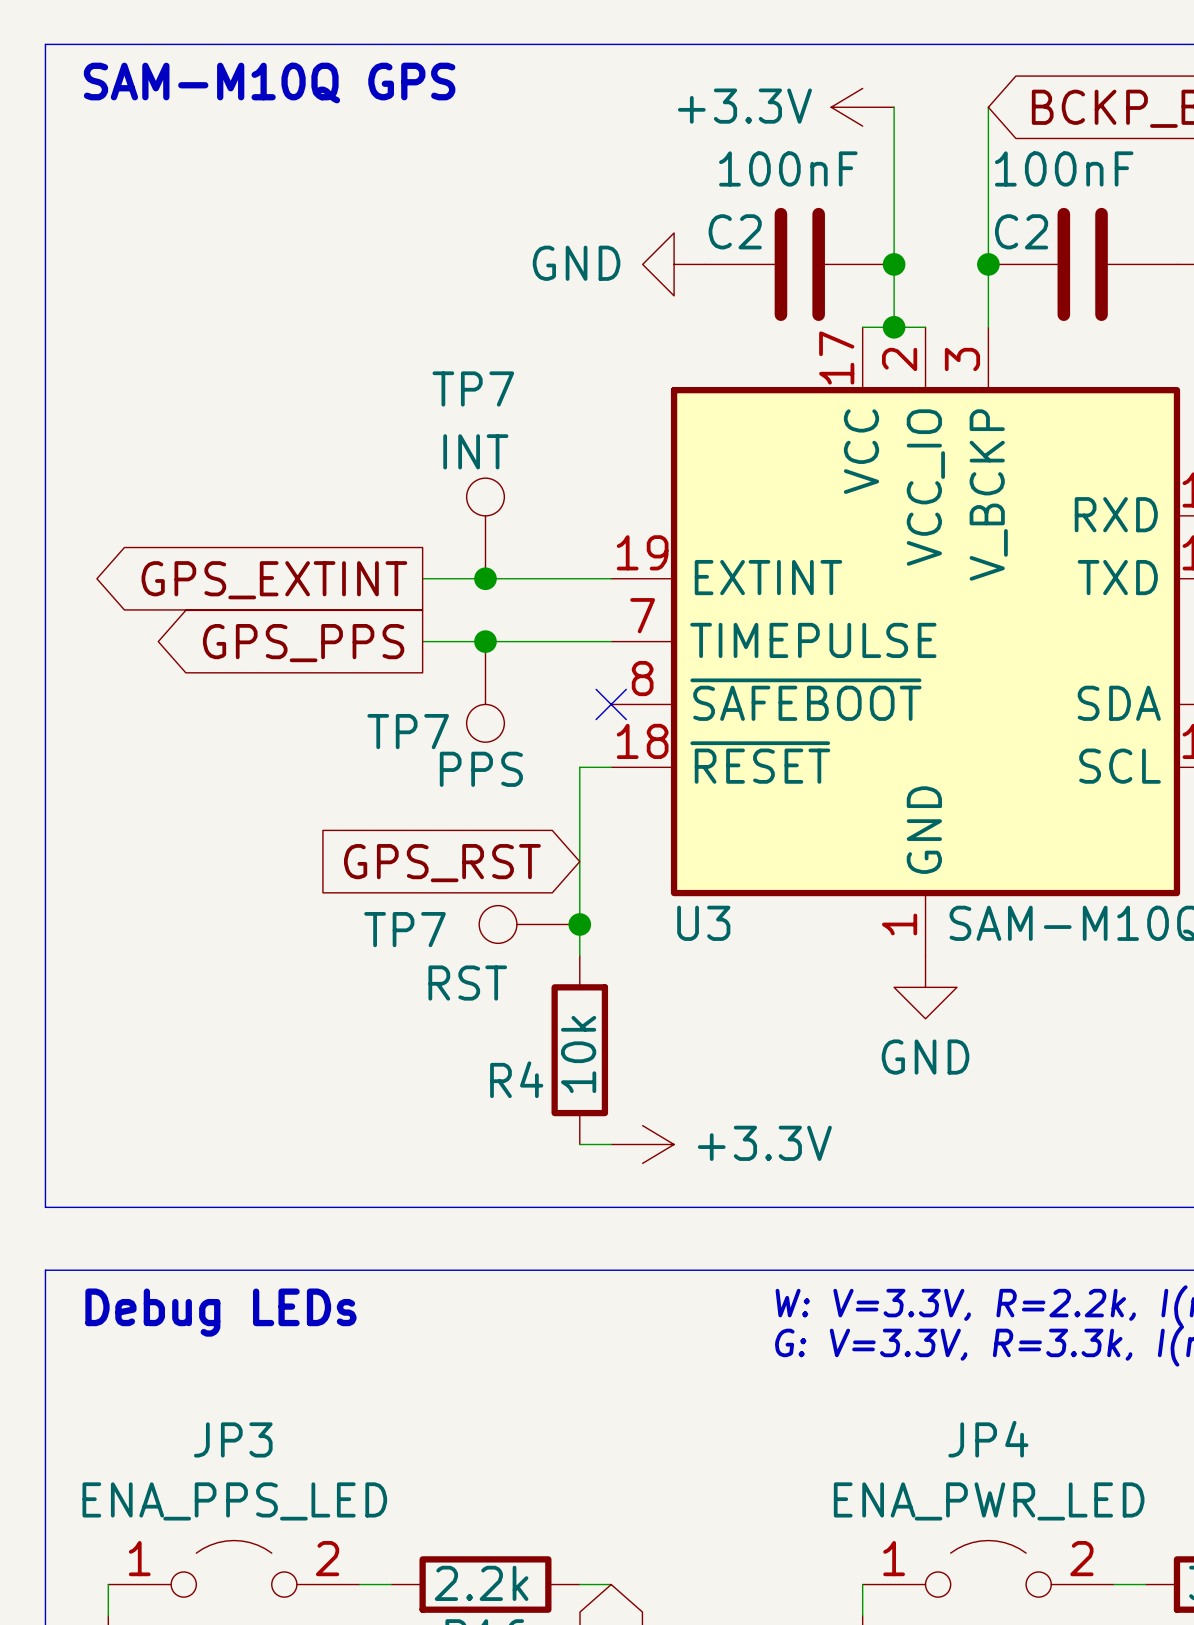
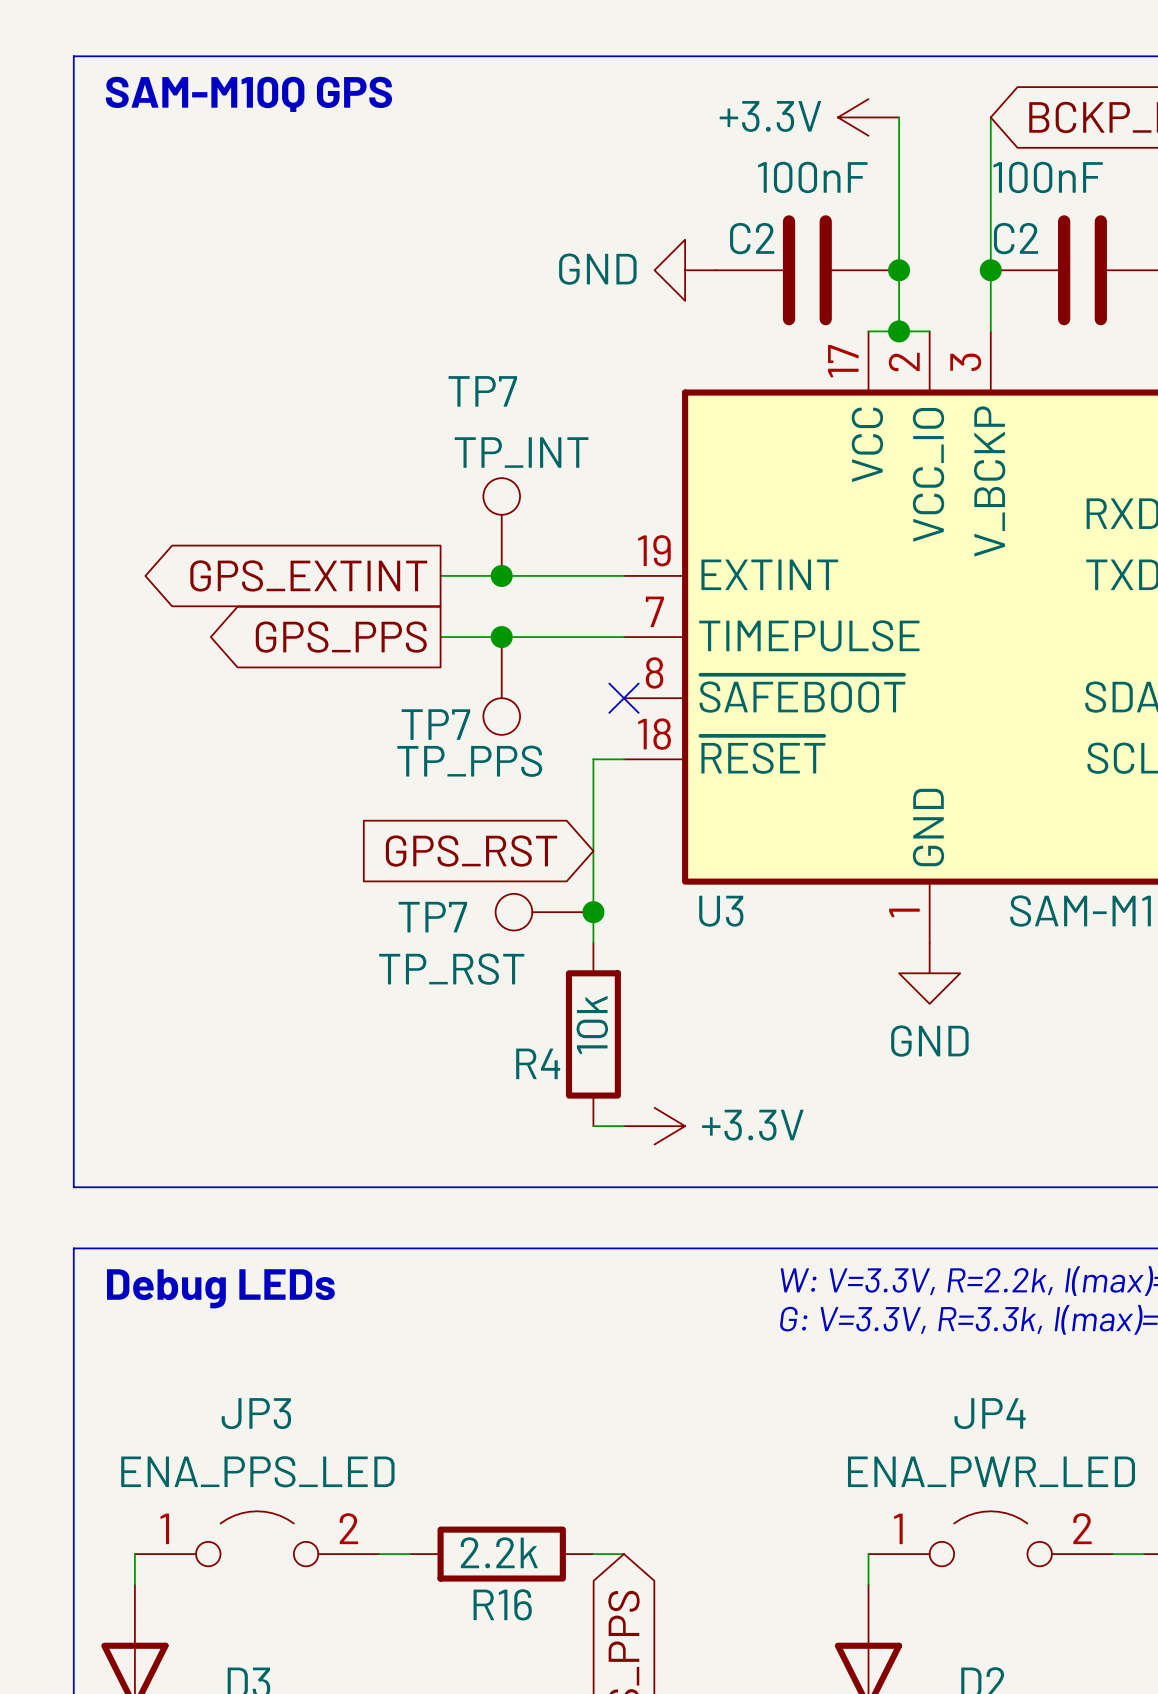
TP7 value: INT (475, 451) -> TP_INT (521, 452)
TP7 value: PPS (481, 769) -> TP_PPS (469, 761)
TP7 value: RST (467, 983) -> TP_RST (451, 969)

